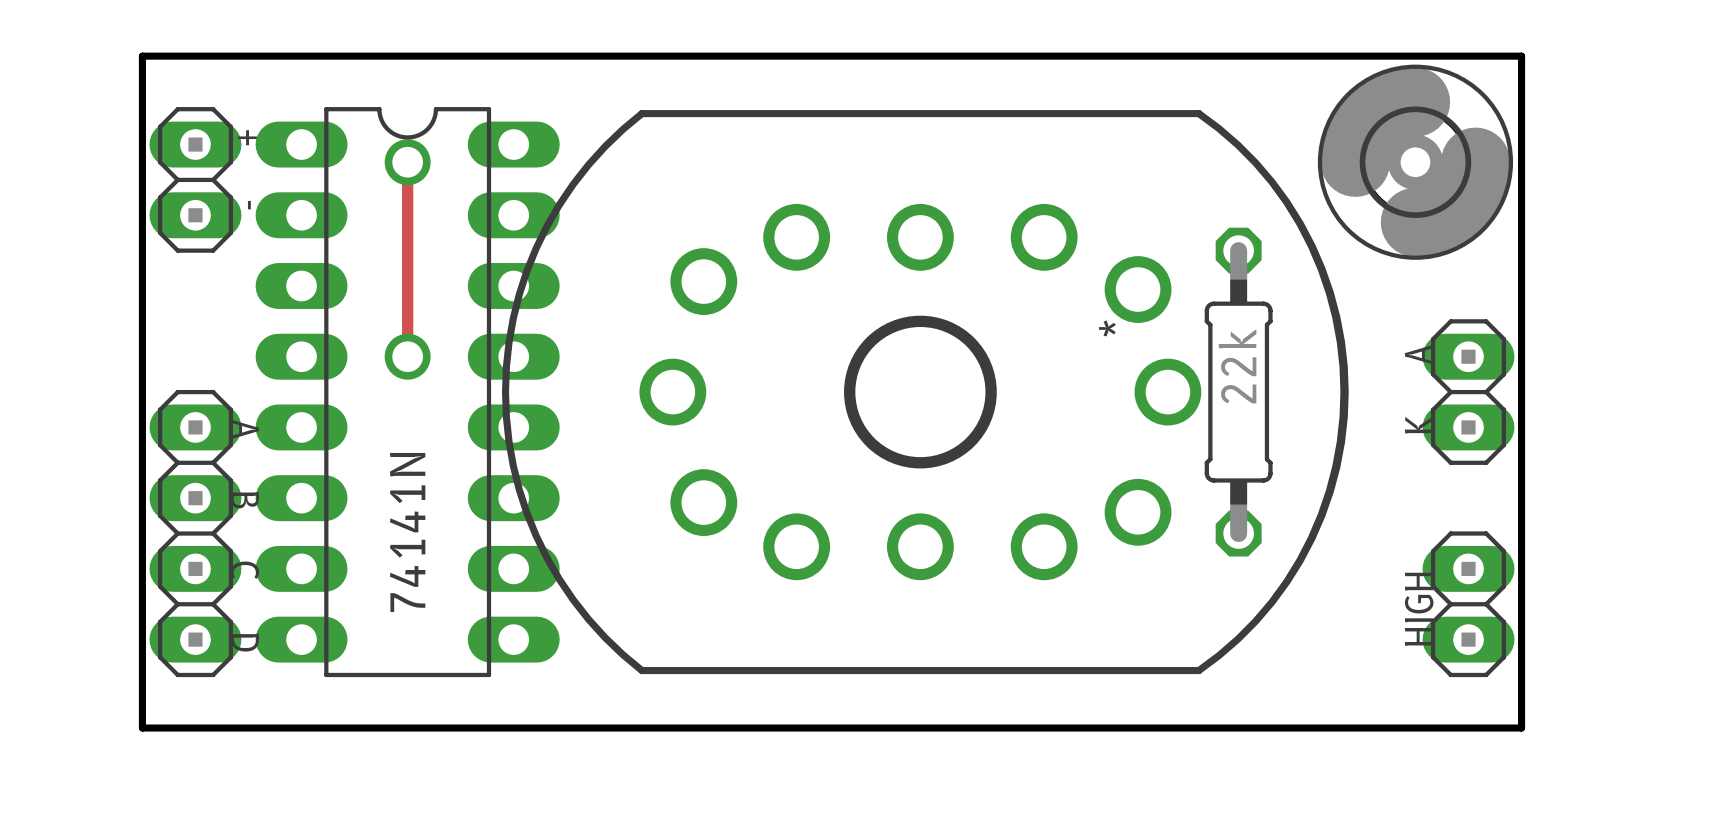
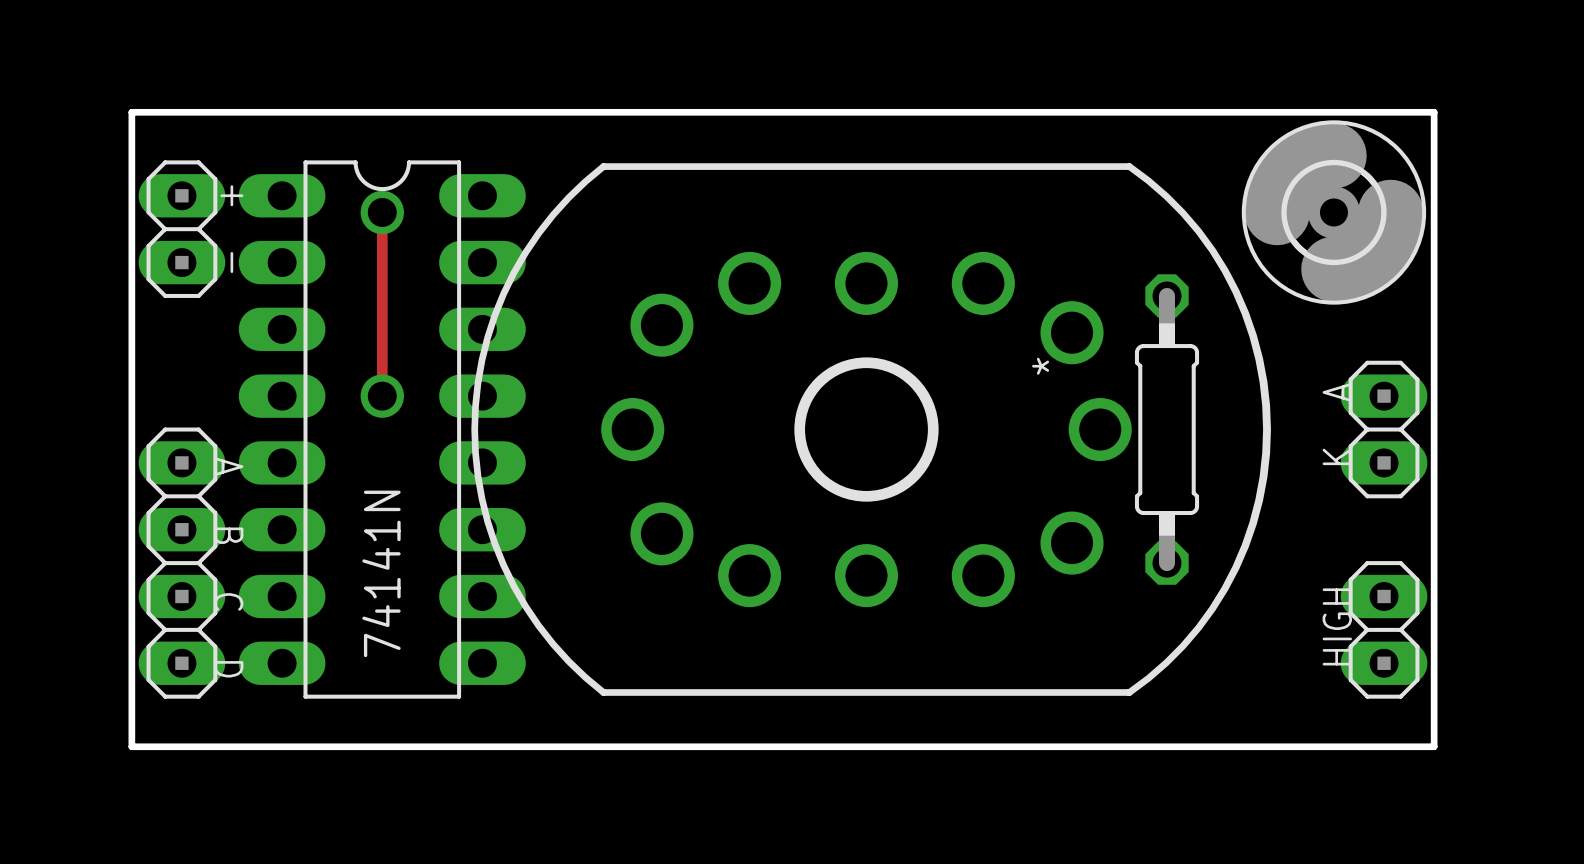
part value: 22k (1237, 366) -> none

